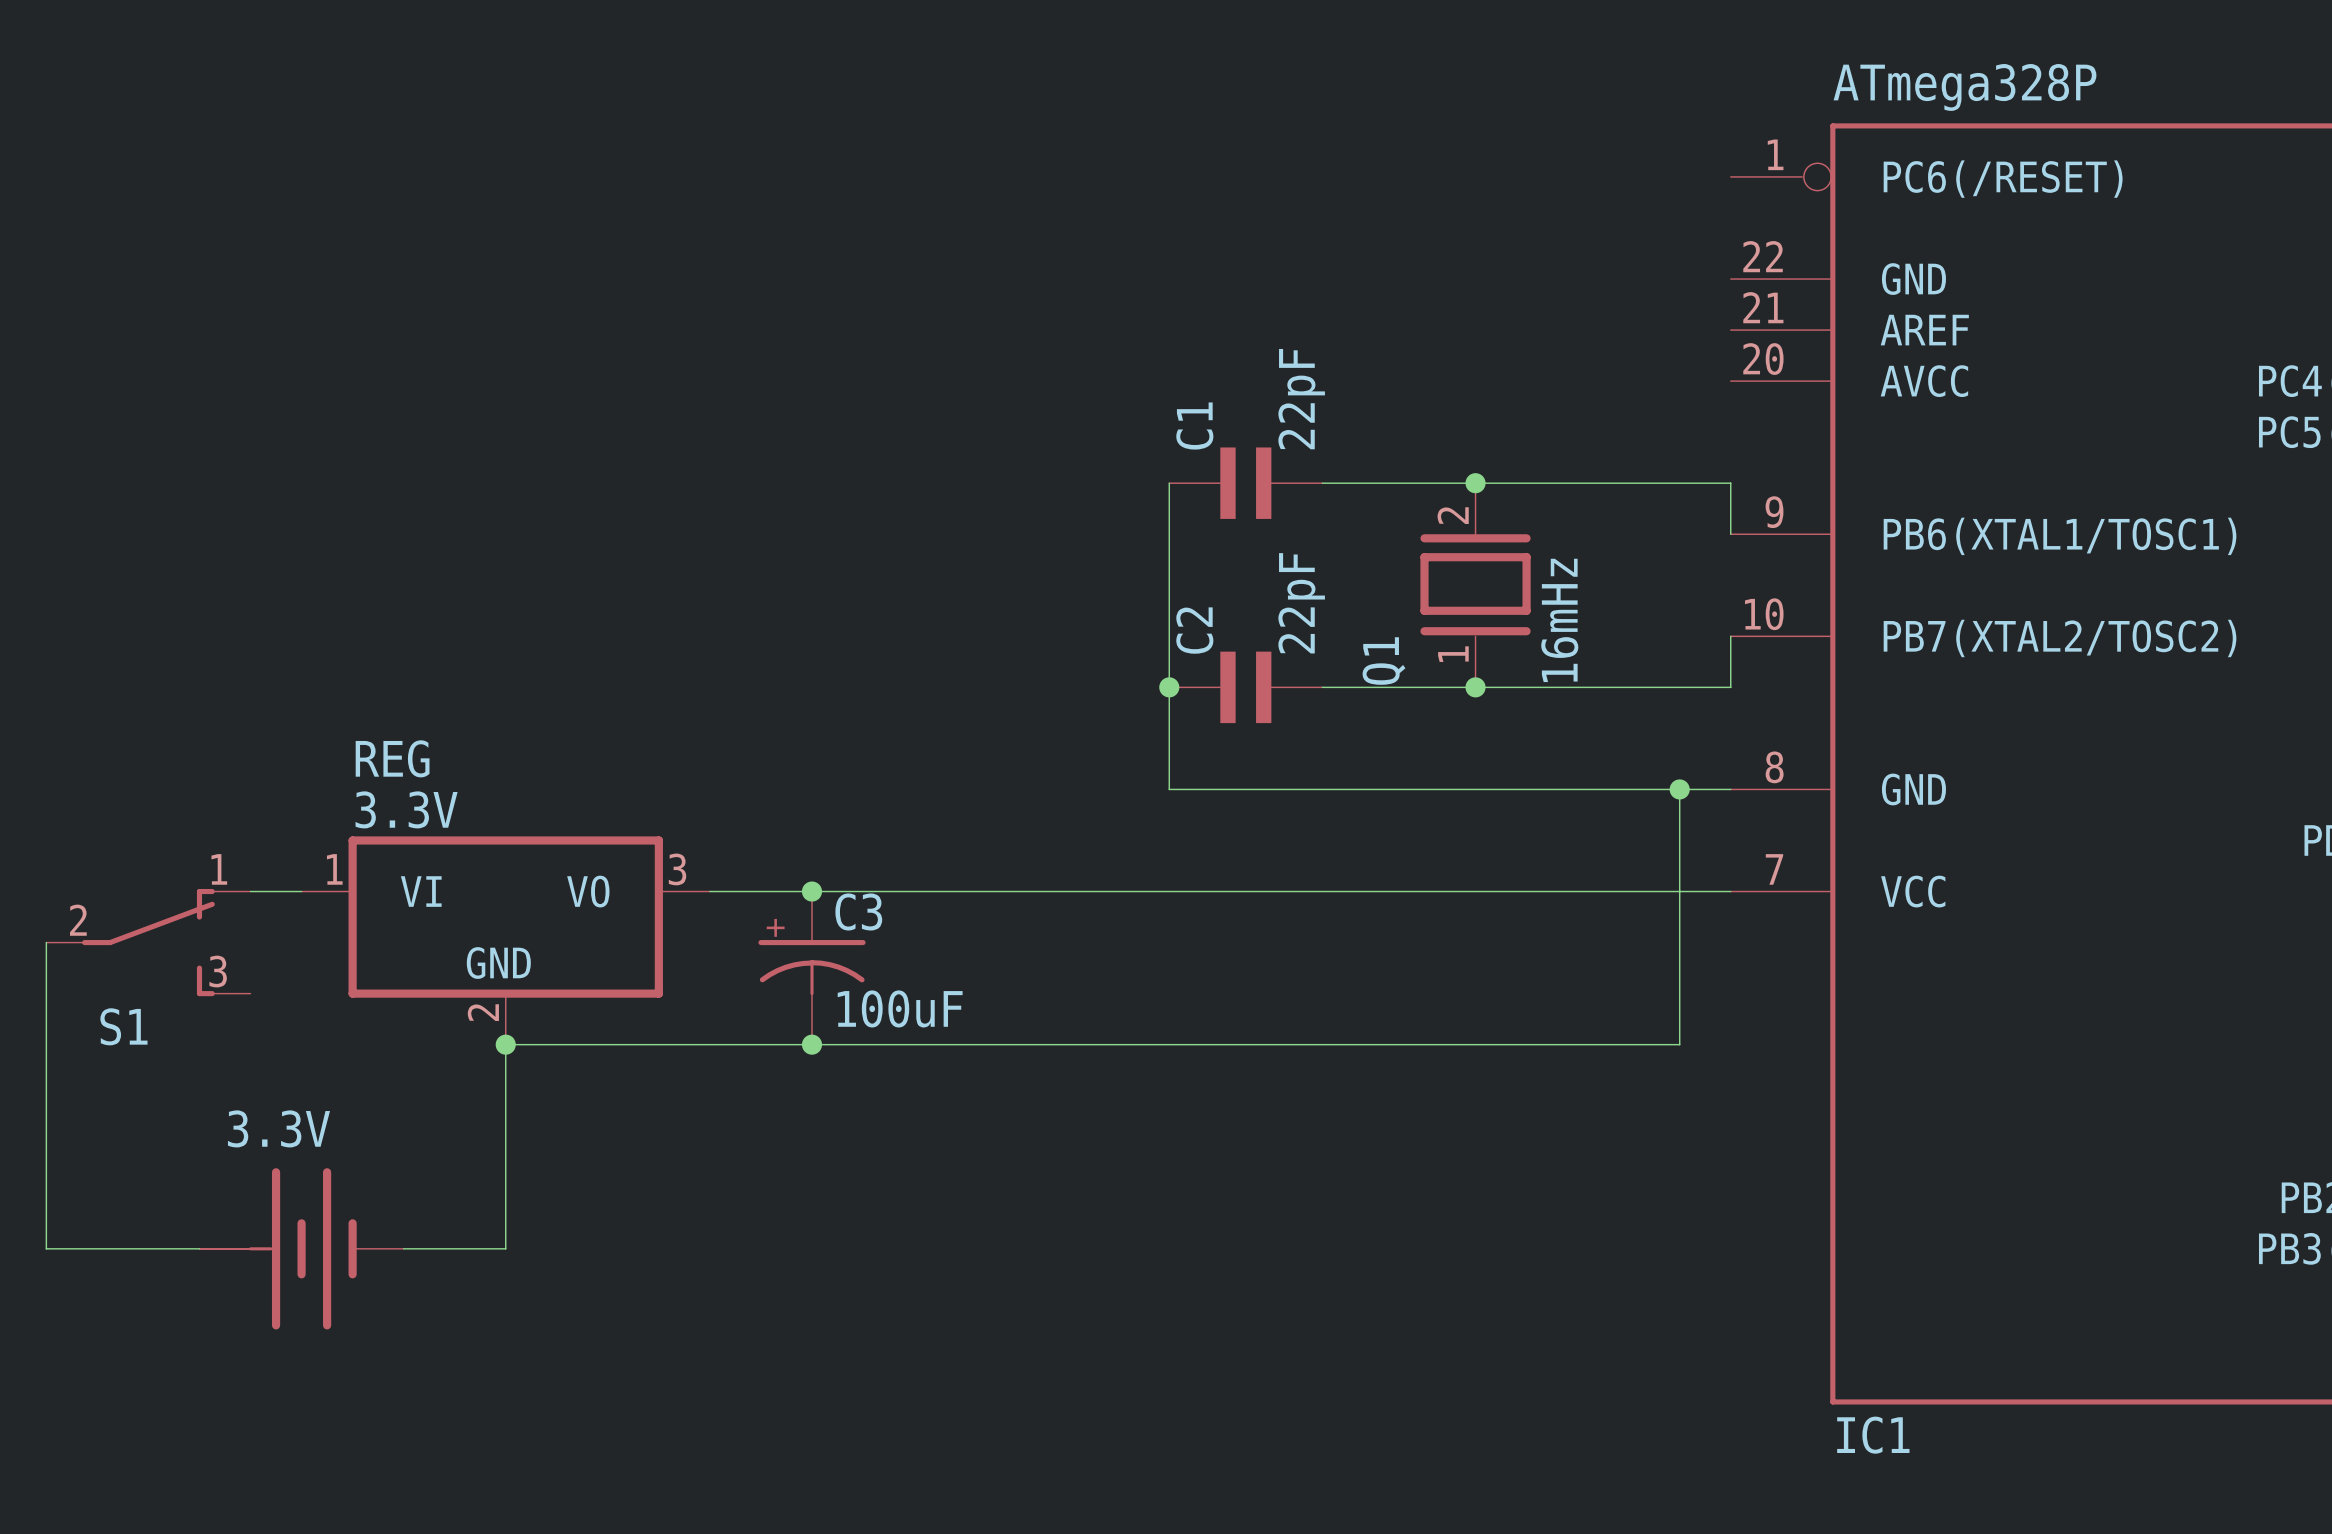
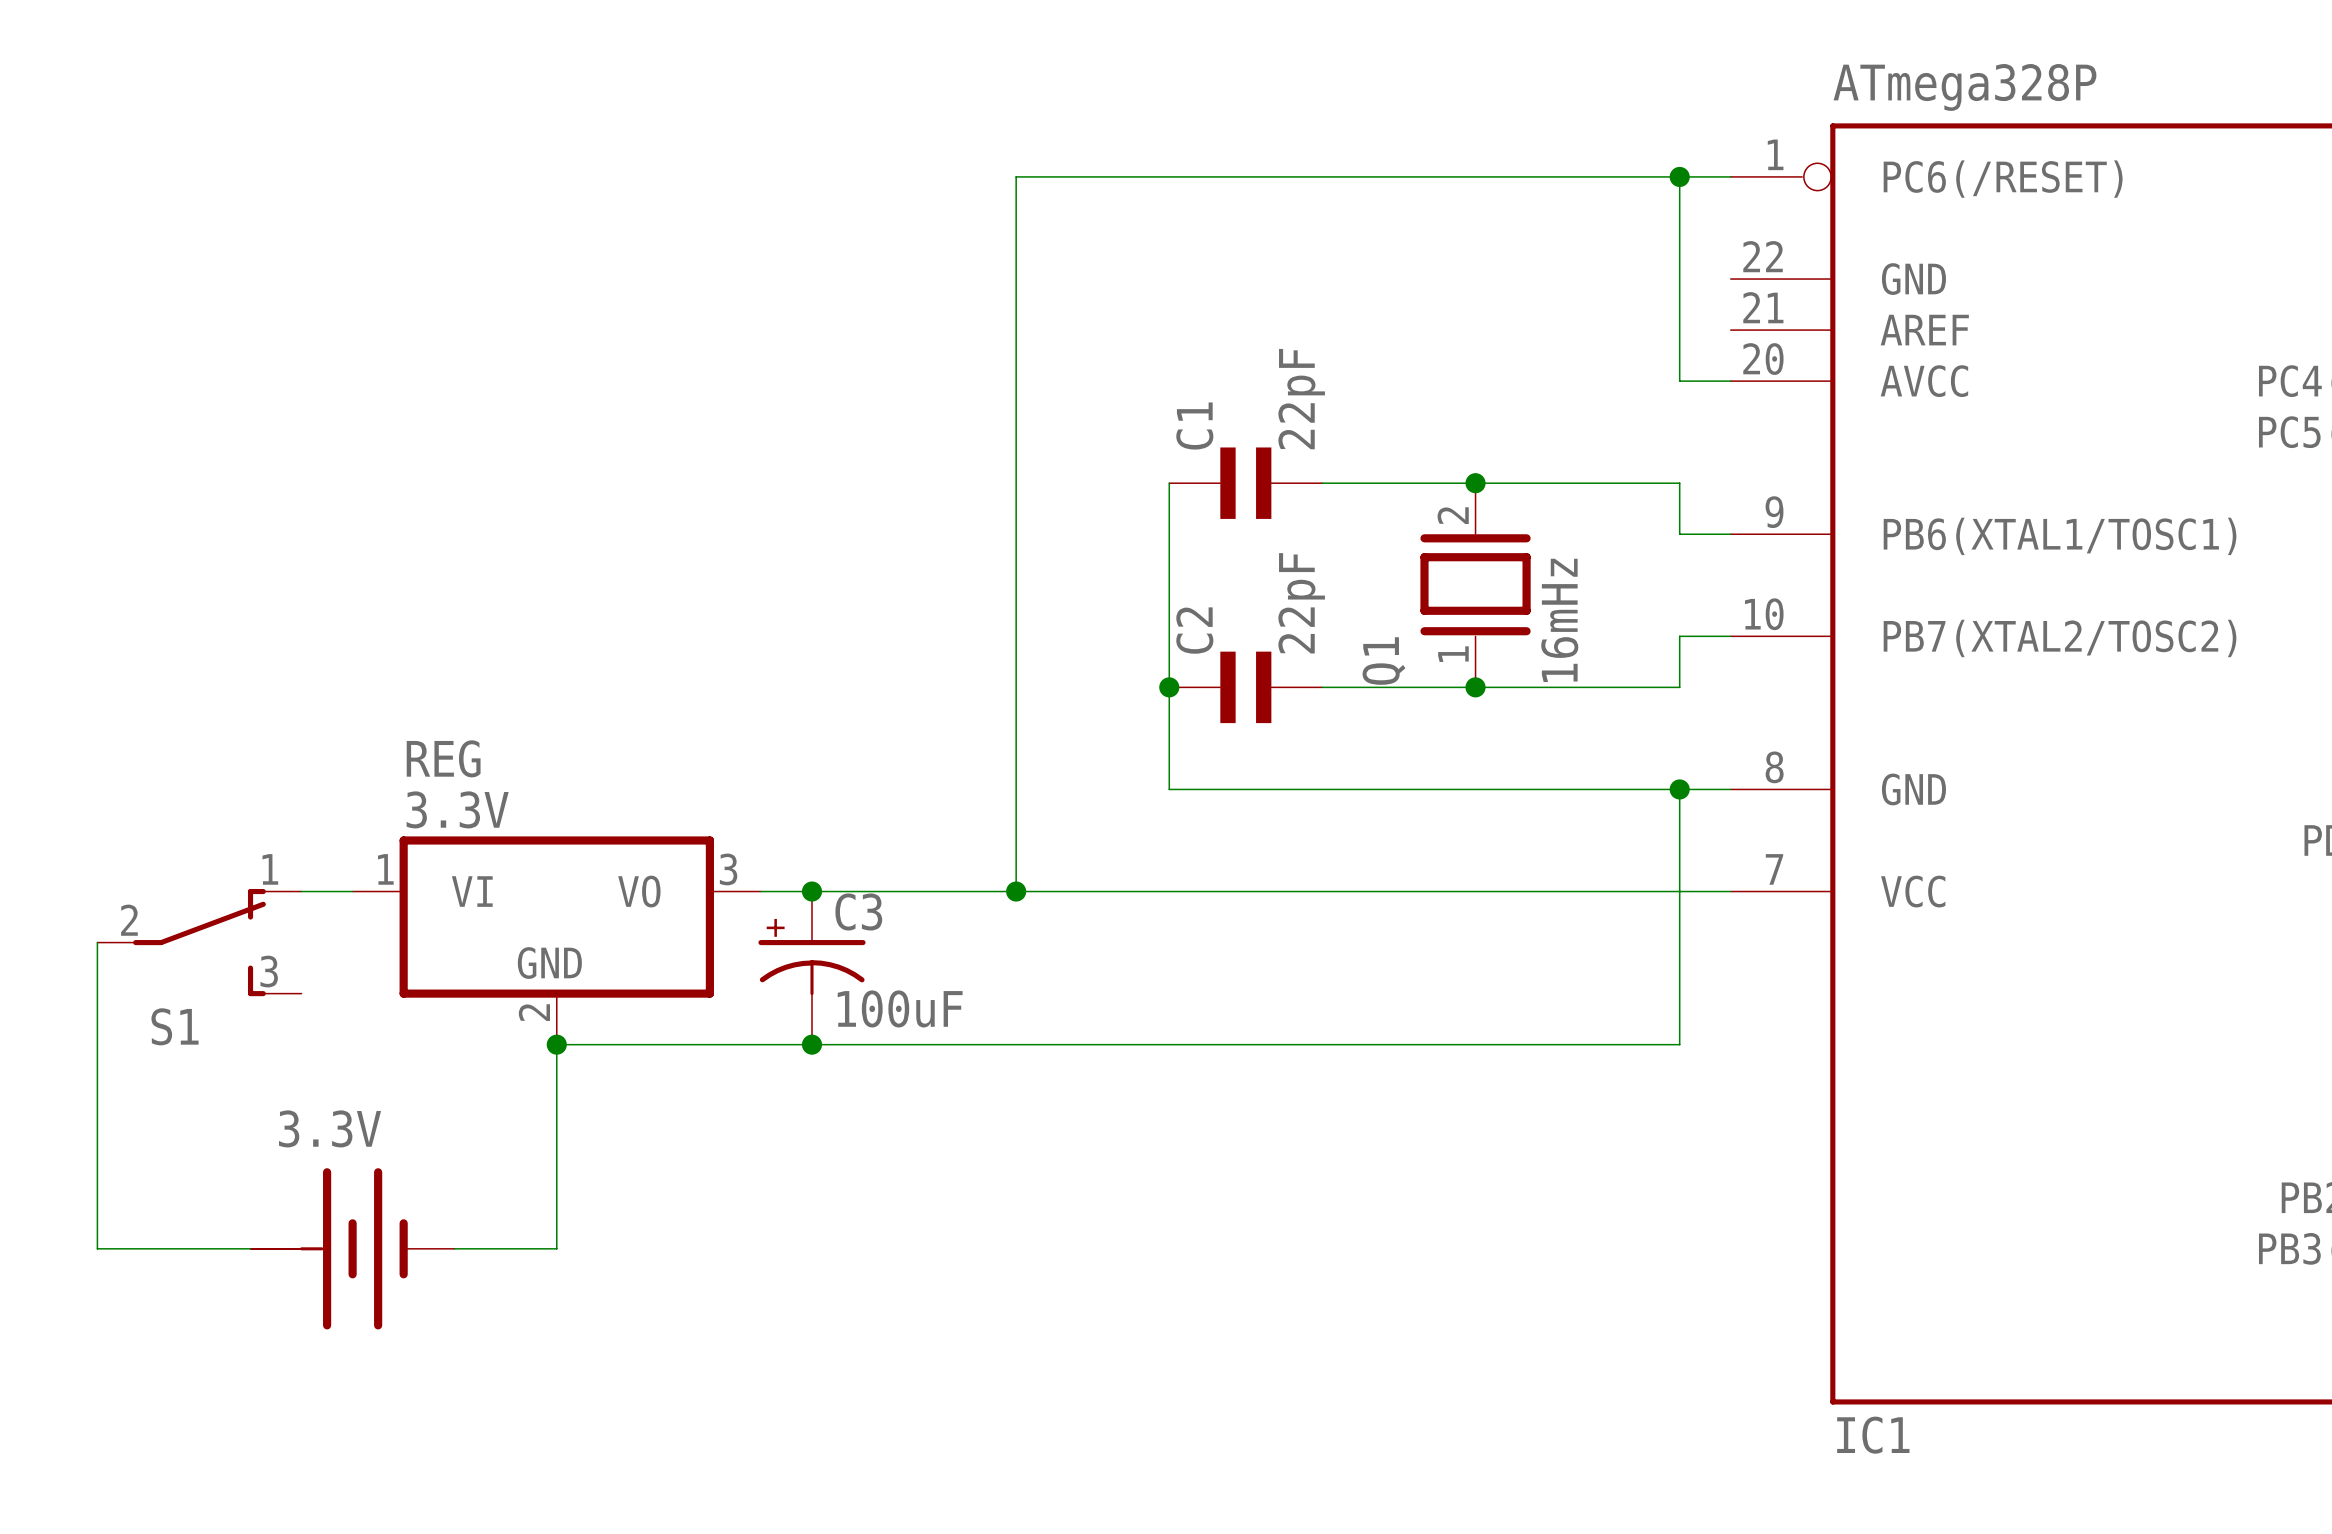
wire: none -> (1679, 176) (1679, 381) (1730, 381)
junction: none -> (1679, 176)
wire: none -> (1730, 176) (1016, 176) (1016, 891)
wire: (1679, 483) (1730, 483) (1730, 534) -> (1679, 483) (1679, 534) (1730, 534)
wire: (1730, 636) (1730, 687) (1679, 687) -> (1730, 636) (1679, 636) (1679, 687)
junction: none -> (1016, 891)
REG position: (505, 940) -> (556, 940)
wire: (46, 942) (46, 1248) (97, 1248) -> (97, 942) (97, 1248)
S1 position: (148, 942) -> (199, 942)
junction position: (505, 1044) -> (556, 1044)
wire: (556, 1044) (505, 1044) (505, 1248) -> (556, 1044) (556, 1248) (505, 1248)
3.3V position: (301, 1248) -> (352, 1248)

